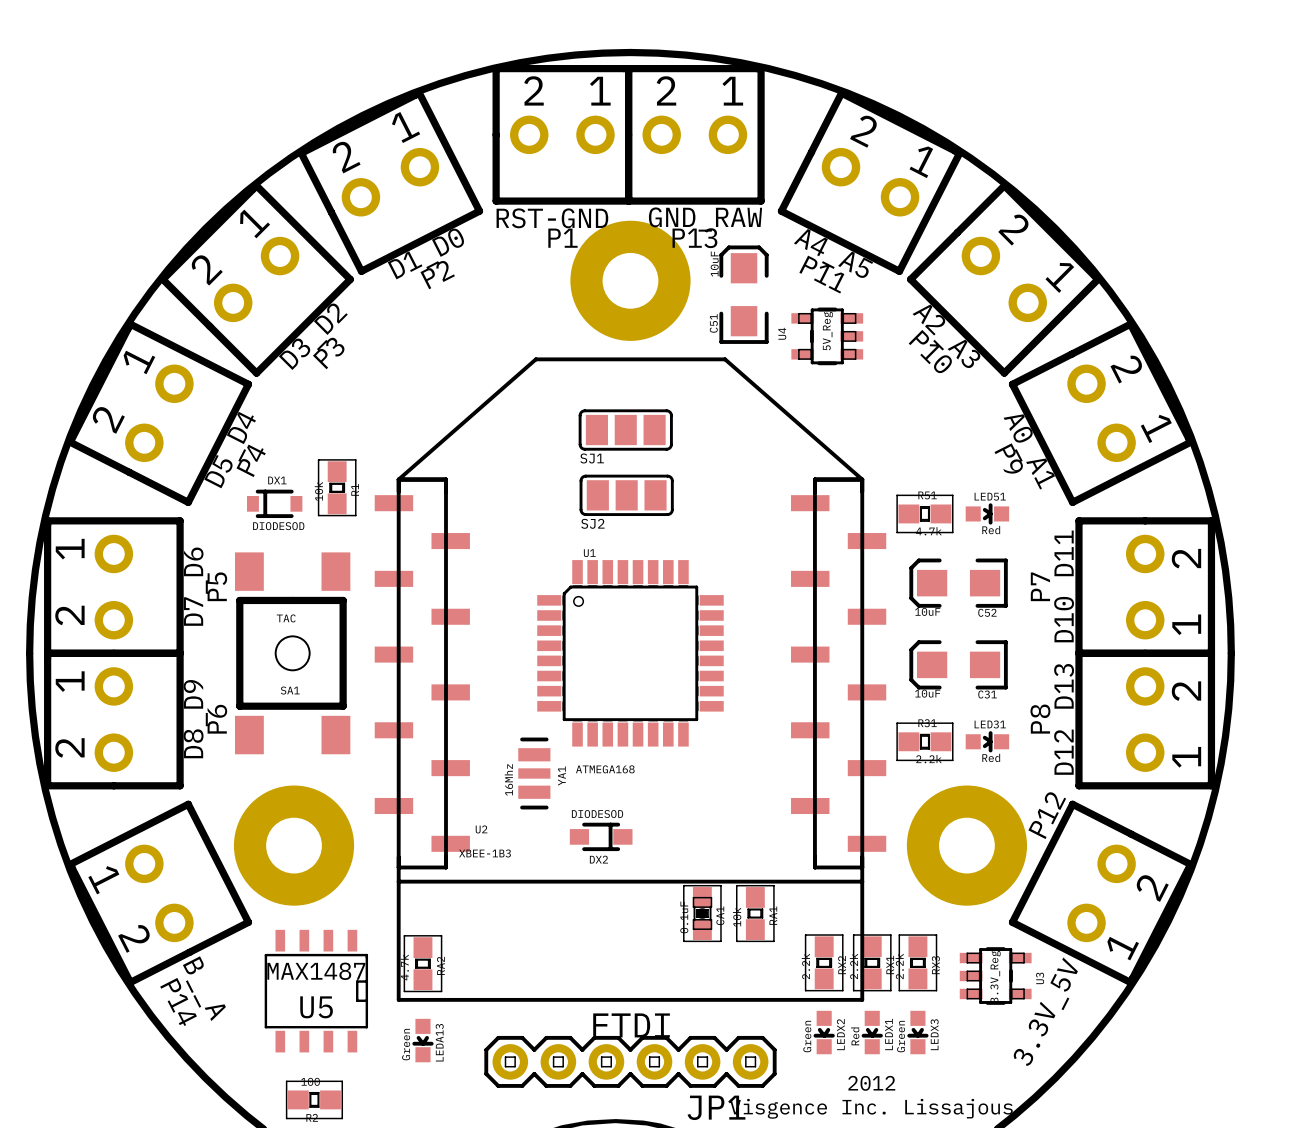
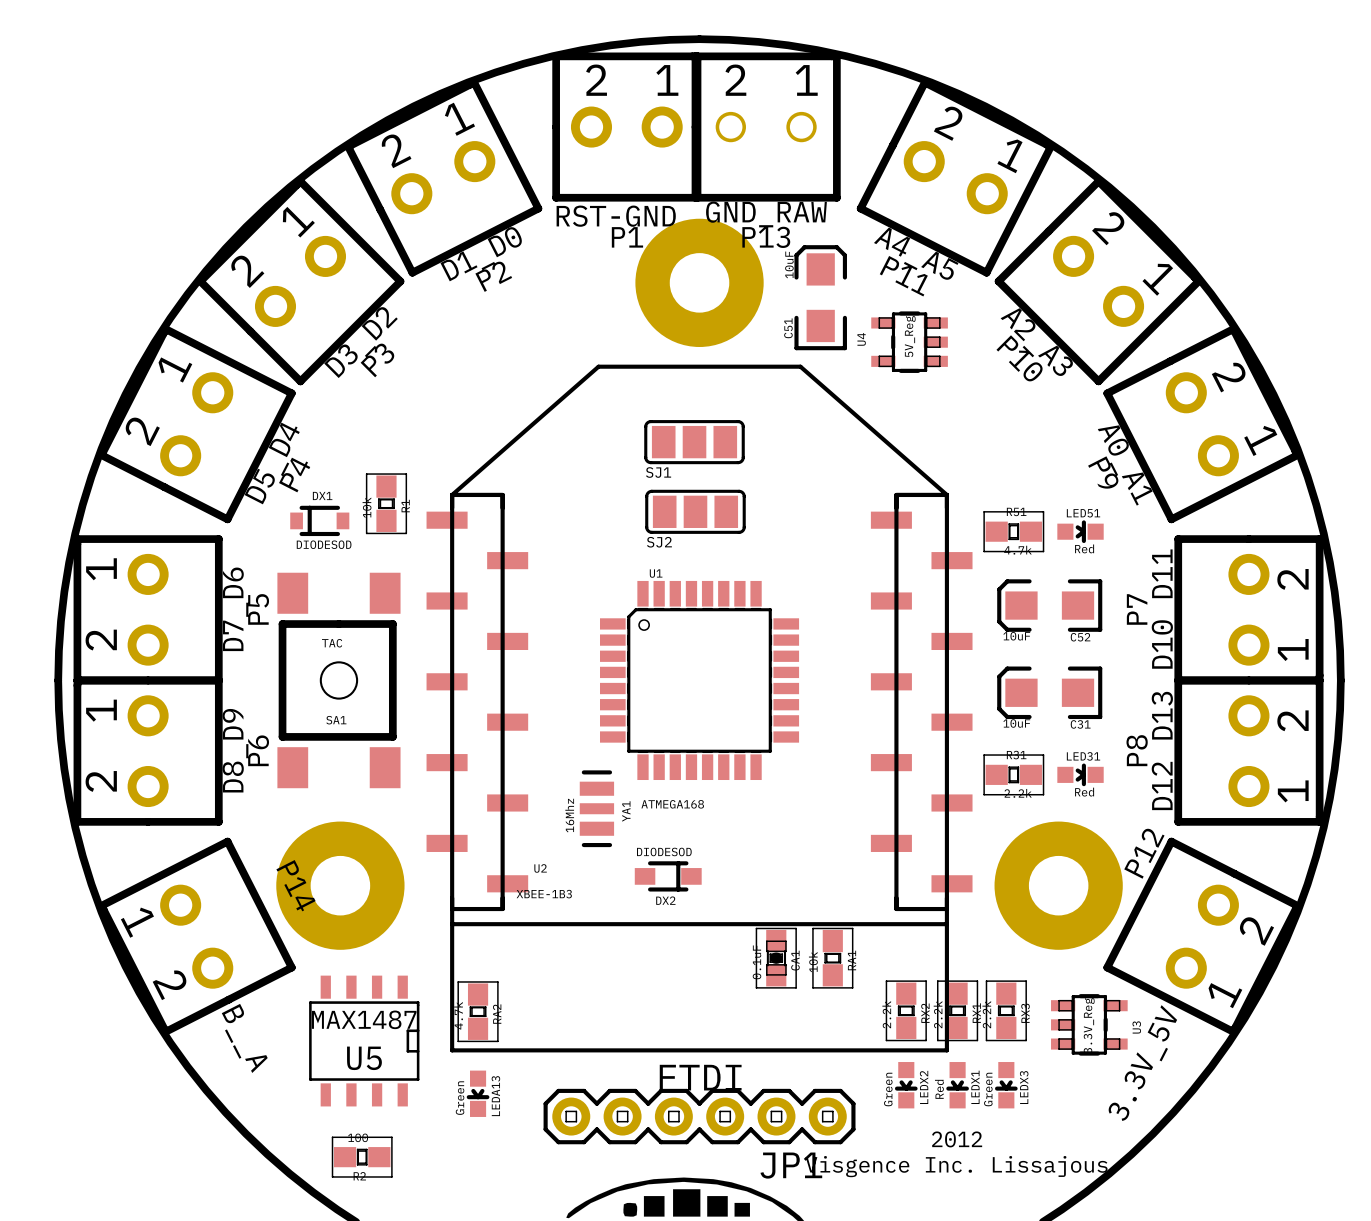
P13 footprint: [624, 65, 765, 205] -> [691, 52, 841, 202]
P14 name position: P14 (178, 1001) -> P14 (296, 885)

